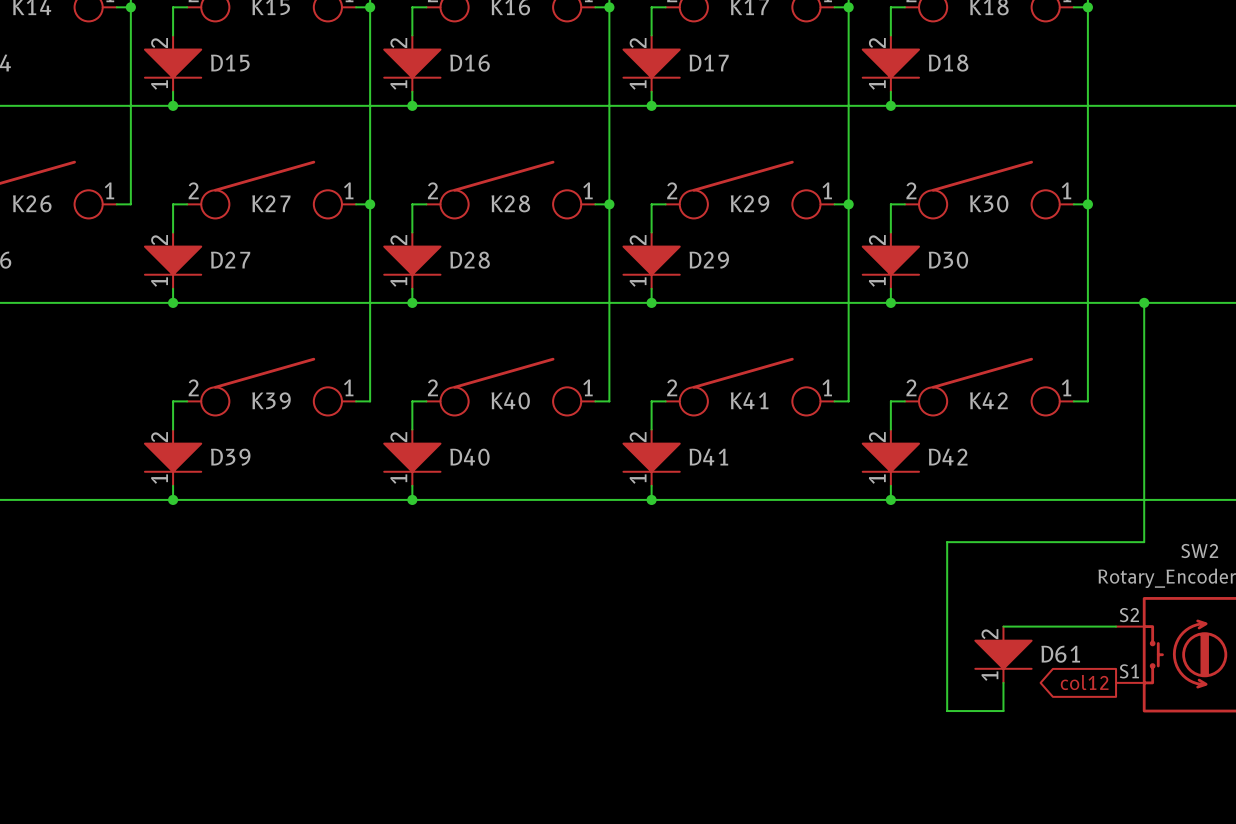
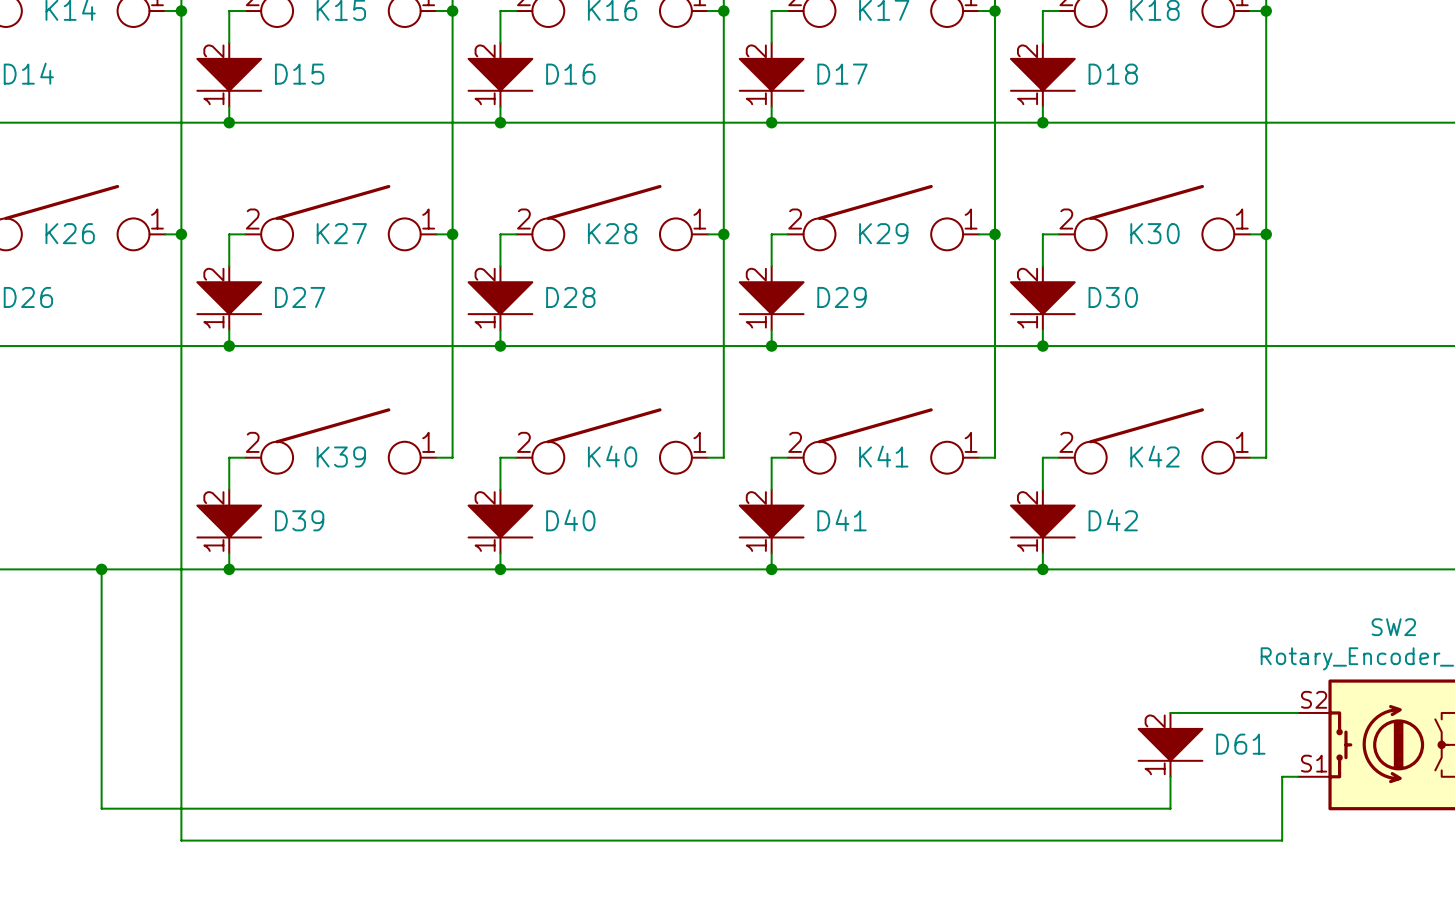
wire: none -> (181, 234) (181, 840) (1282, 840) (1282, 776) (1298, 776)
junction: none -> (181, 234)
wire: (1144, 302) (1144, 542) (947, 542) (947, 711) -> (101, 569) (101, 808) (1106, 808)
junction: (1144, 302) -> none
junction: none -> (101, 569)
global label: col12 (1084, 682) -> none

